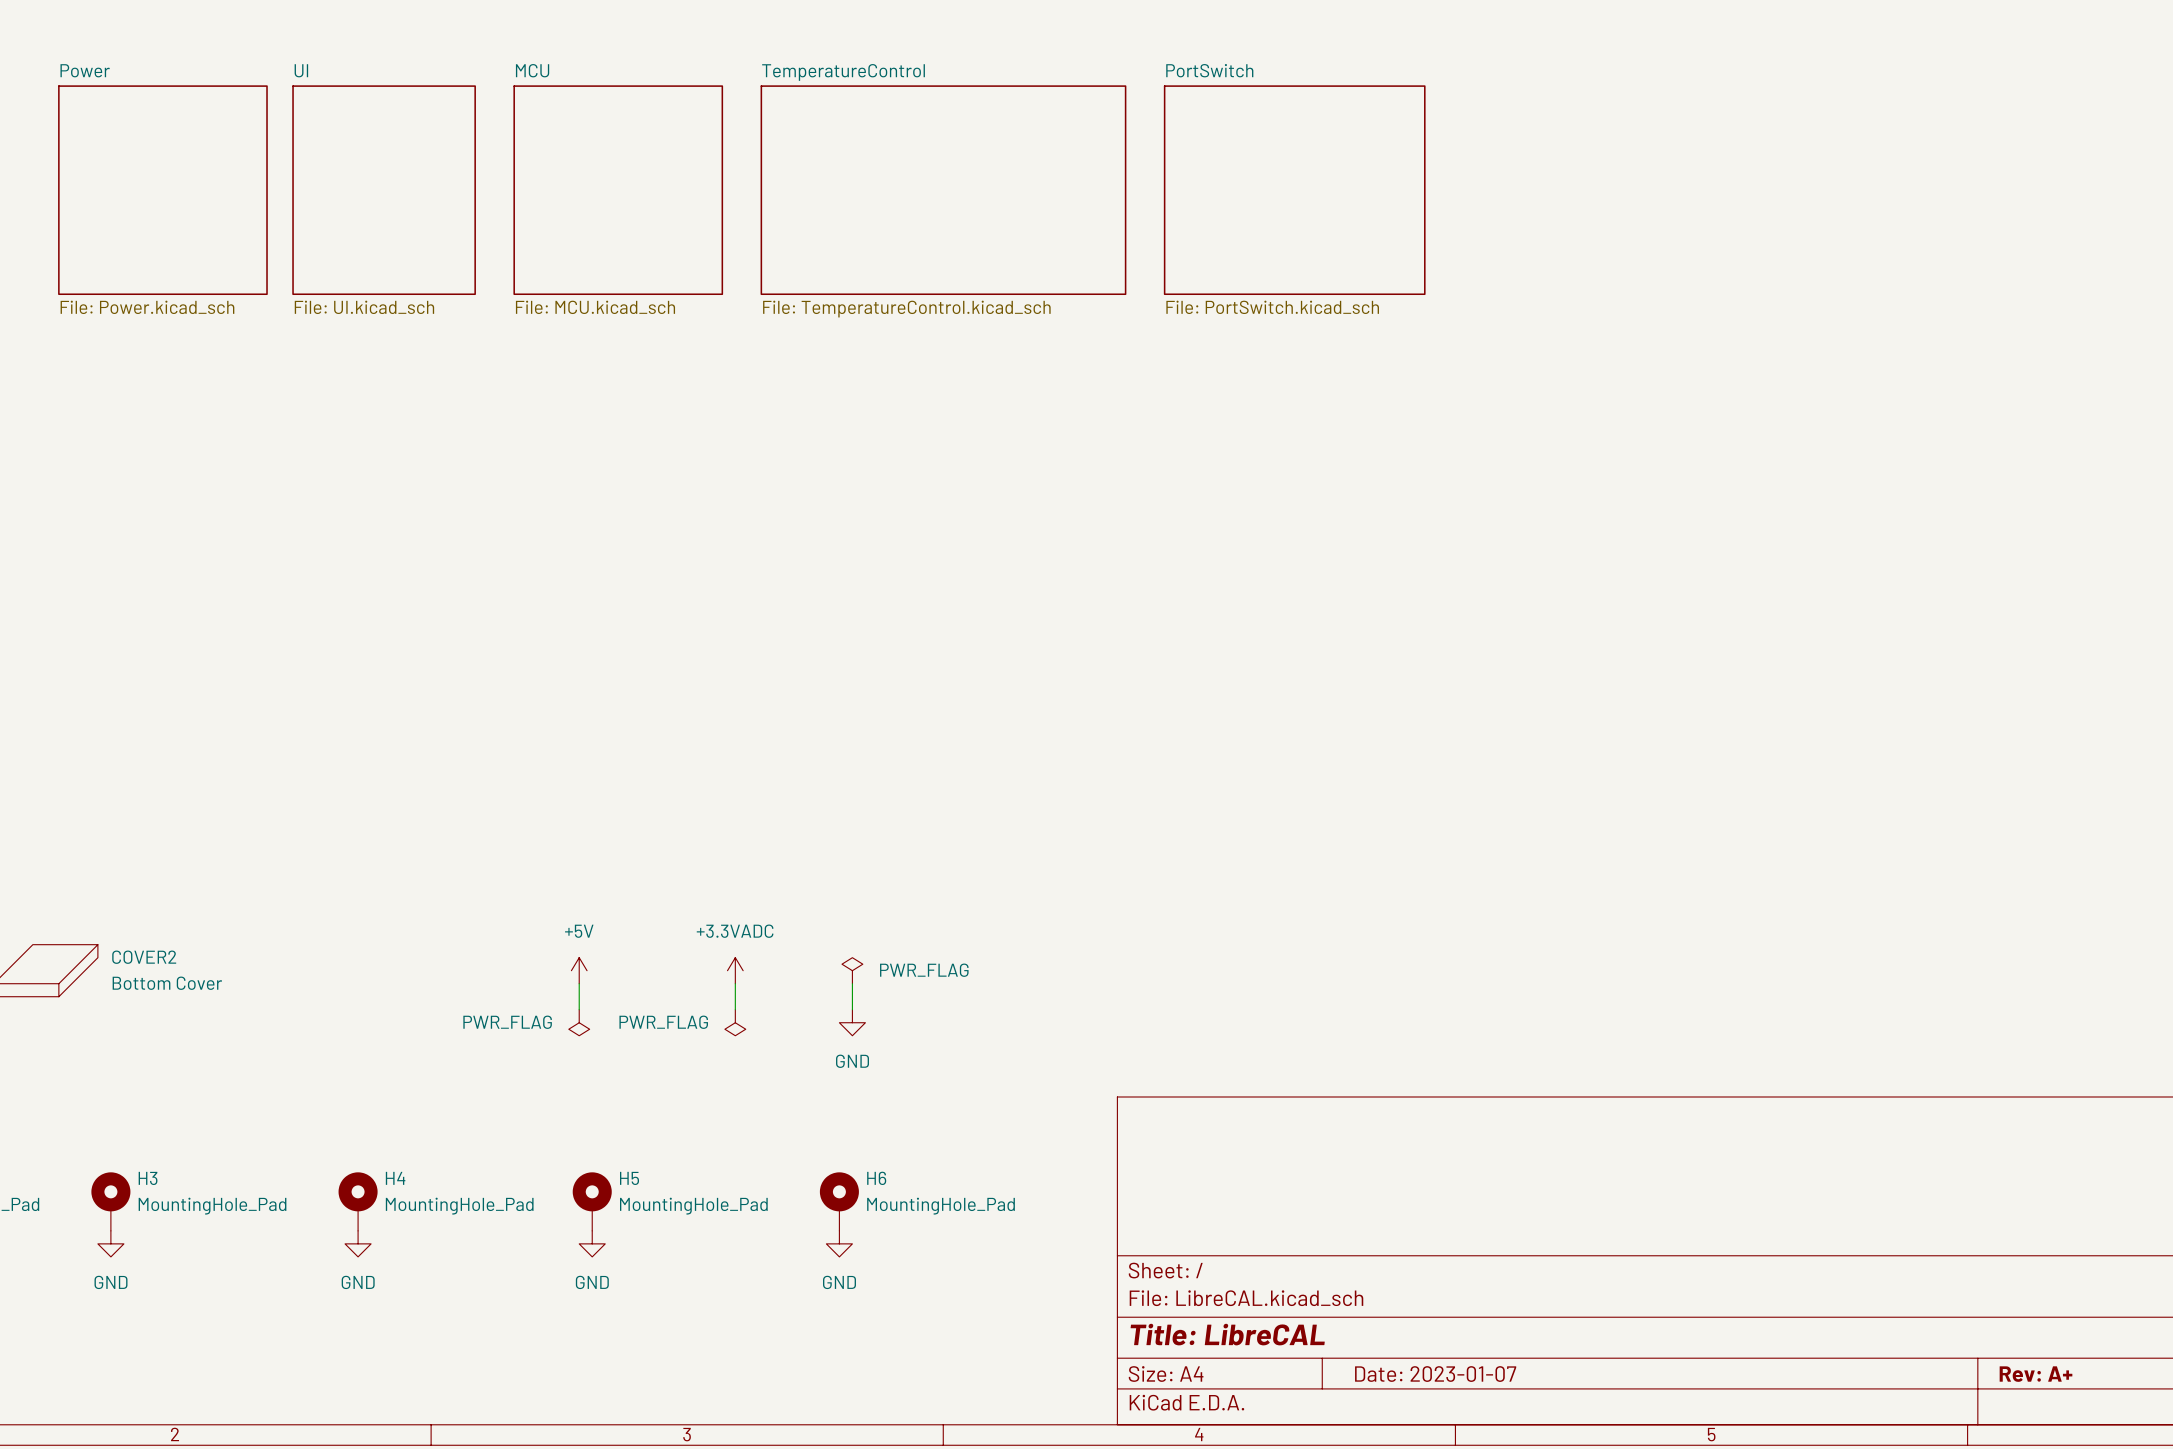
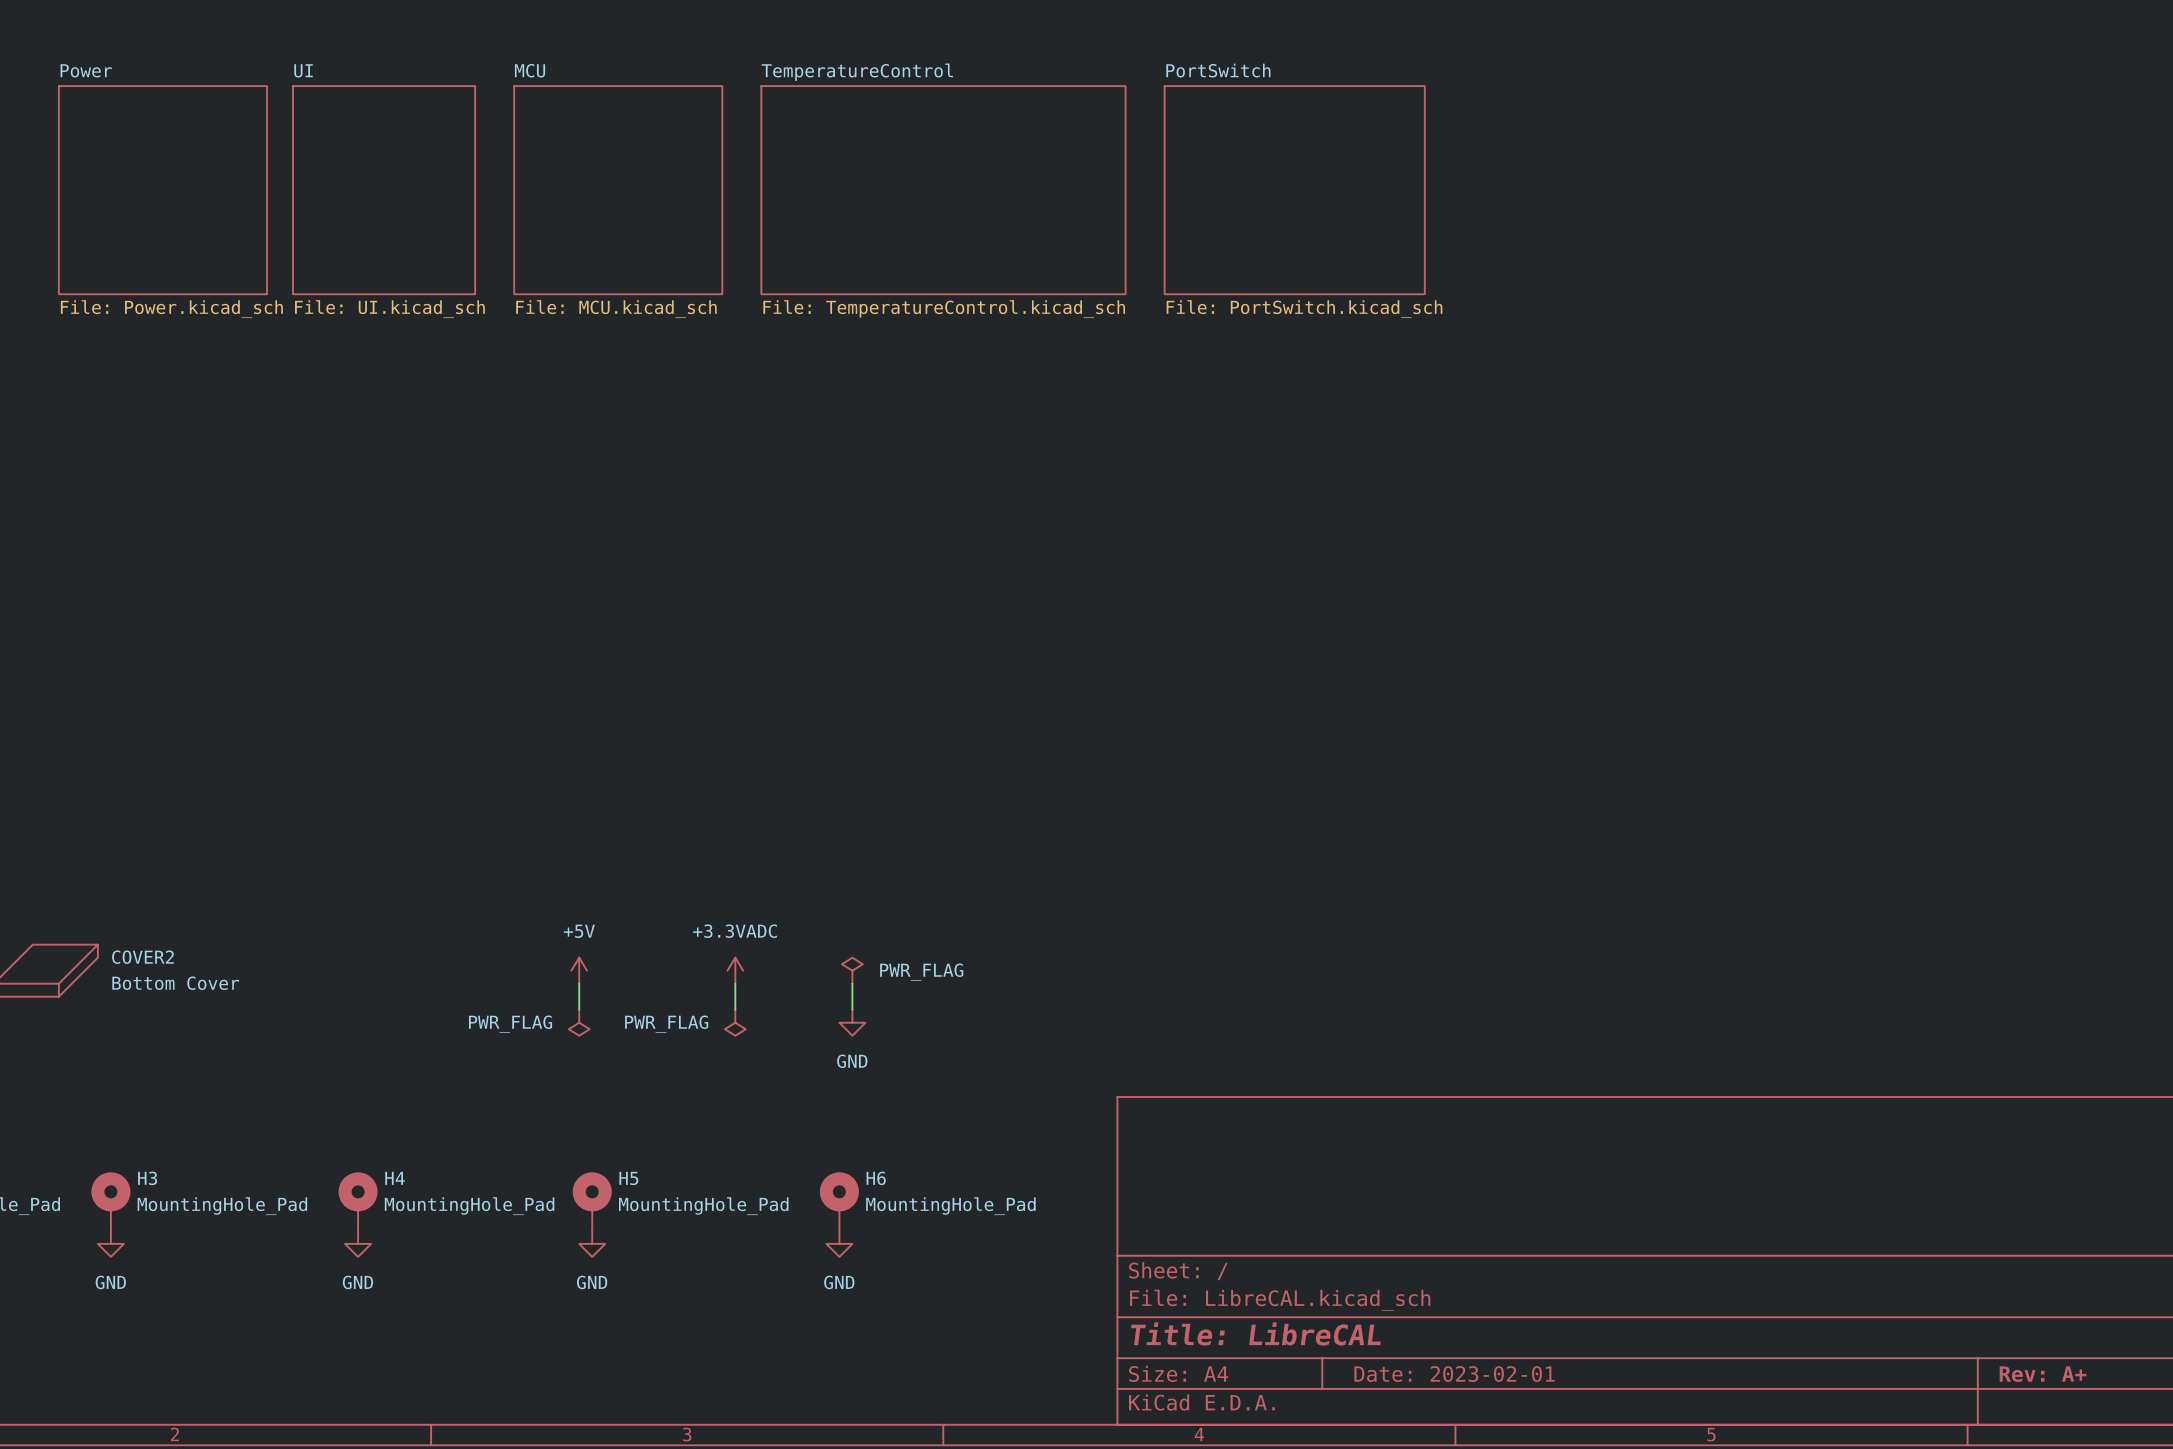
title block: Date: 2023-01-07 (1435, 1374) -> Date: 2023-02-01 (1454, 1374)

